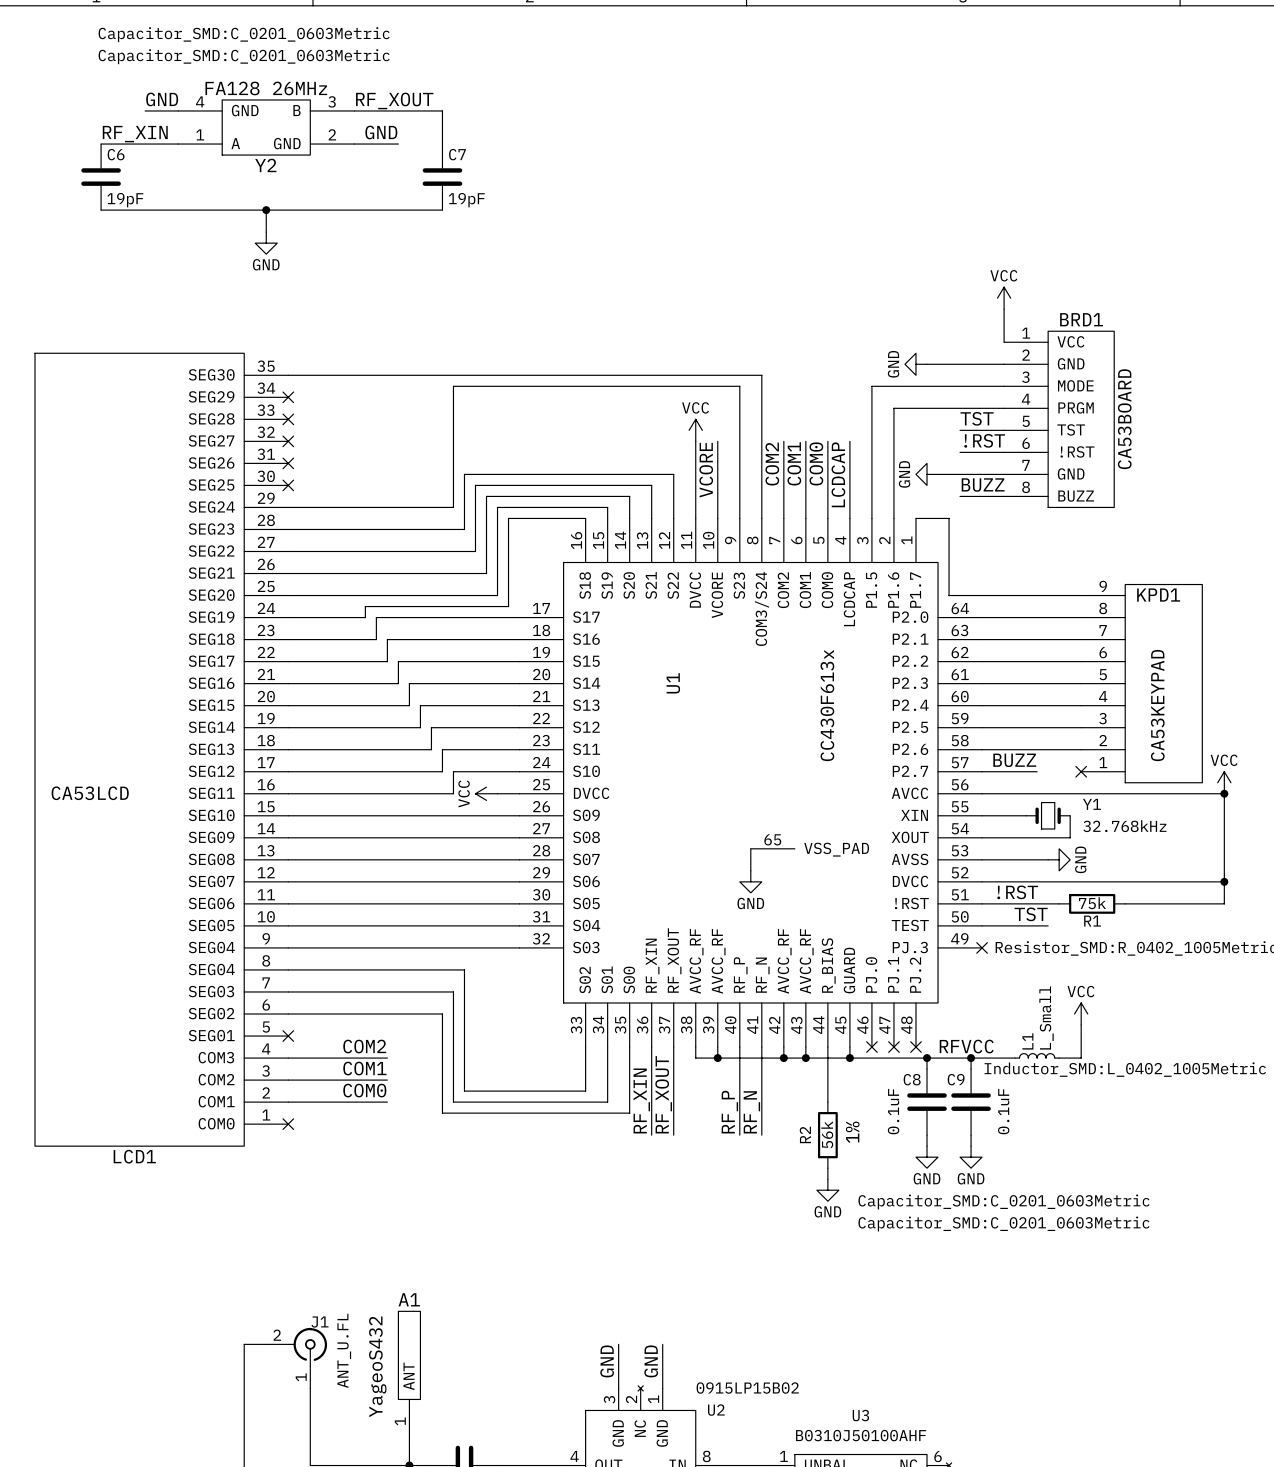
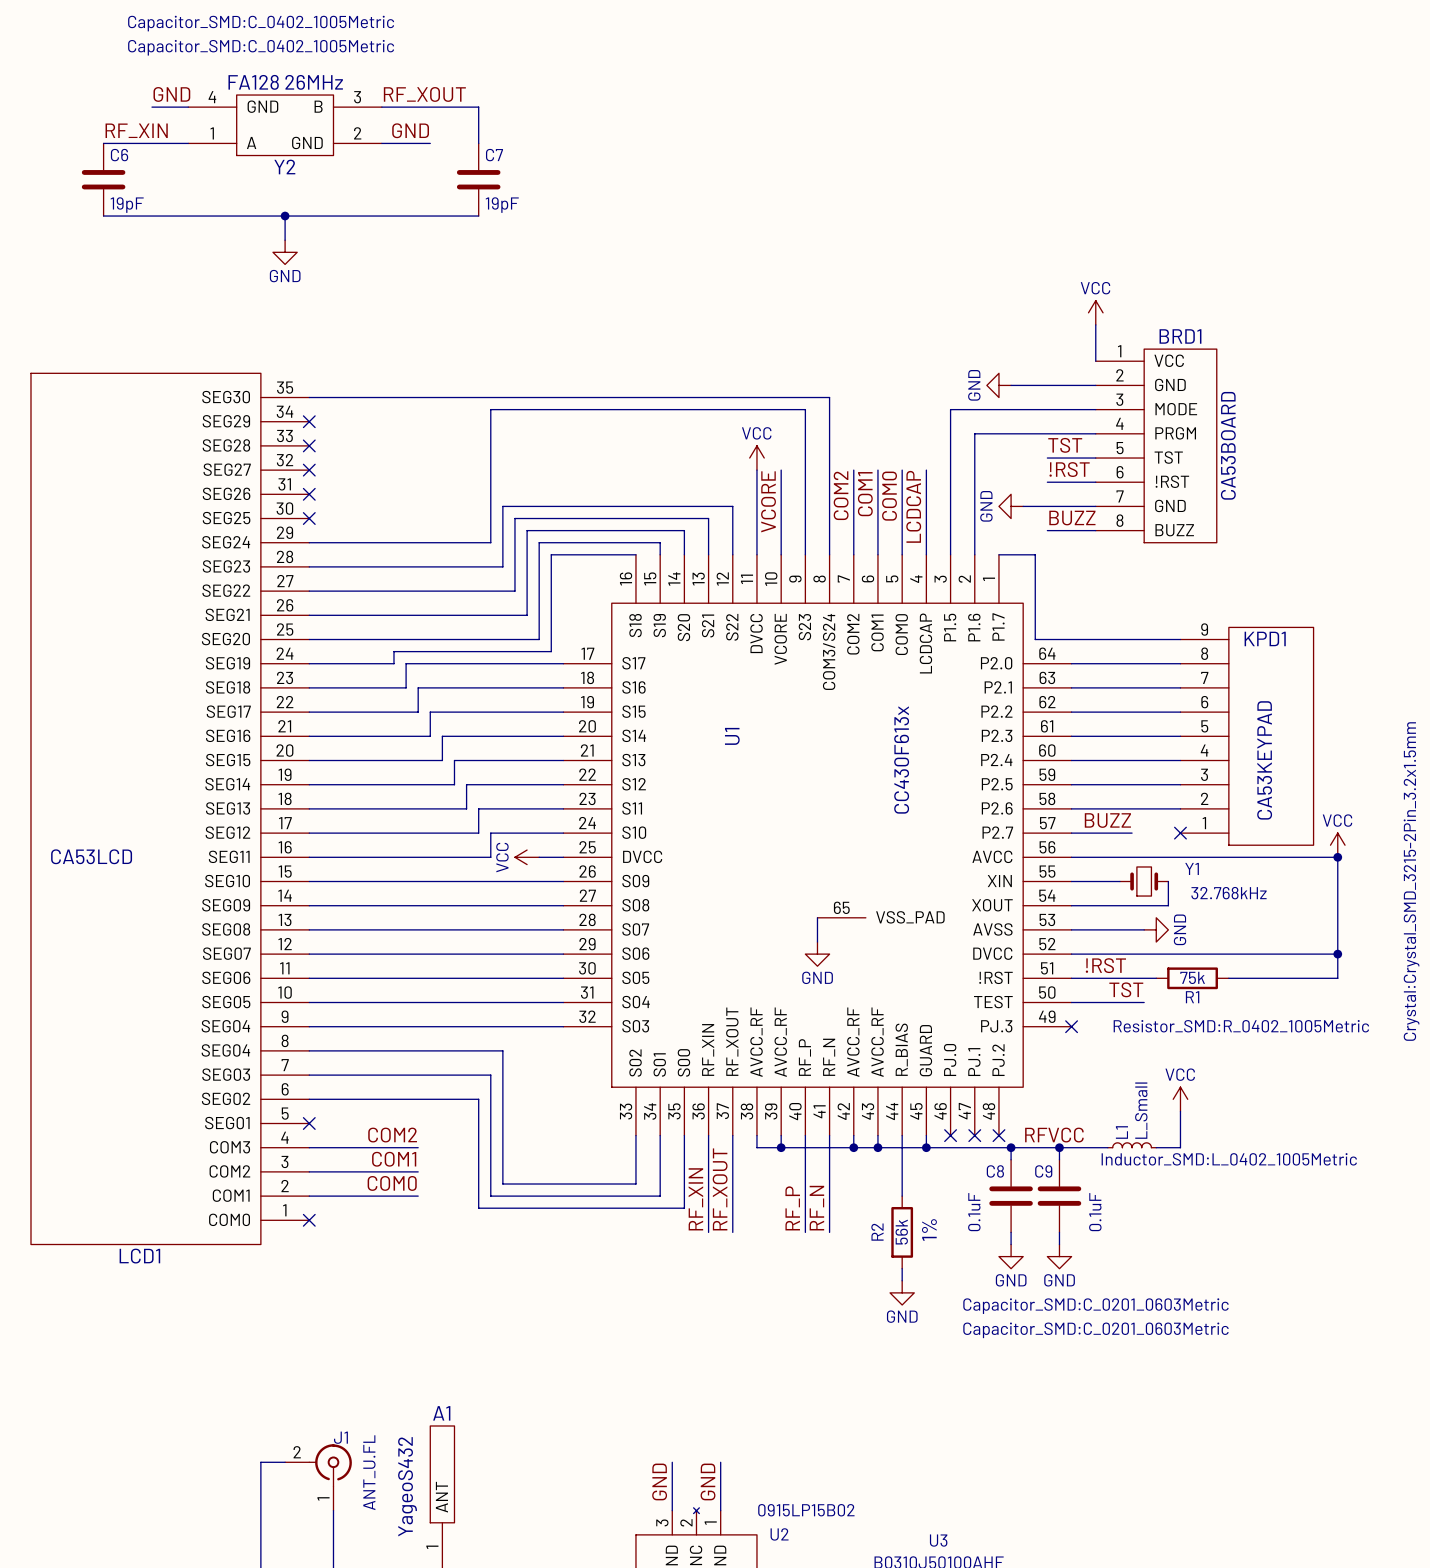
C7 text: Capacitor_SMD:C_0201_0603Metric (244, 34) -> Capacitor_SMD:C_0402_1005Metric (261, 23)
C6 text: Capacitor_SMD:C_0201_0603Metric (244, 56) -> Capacitor_SMD:C_0402_1005Metric (261, 47)

